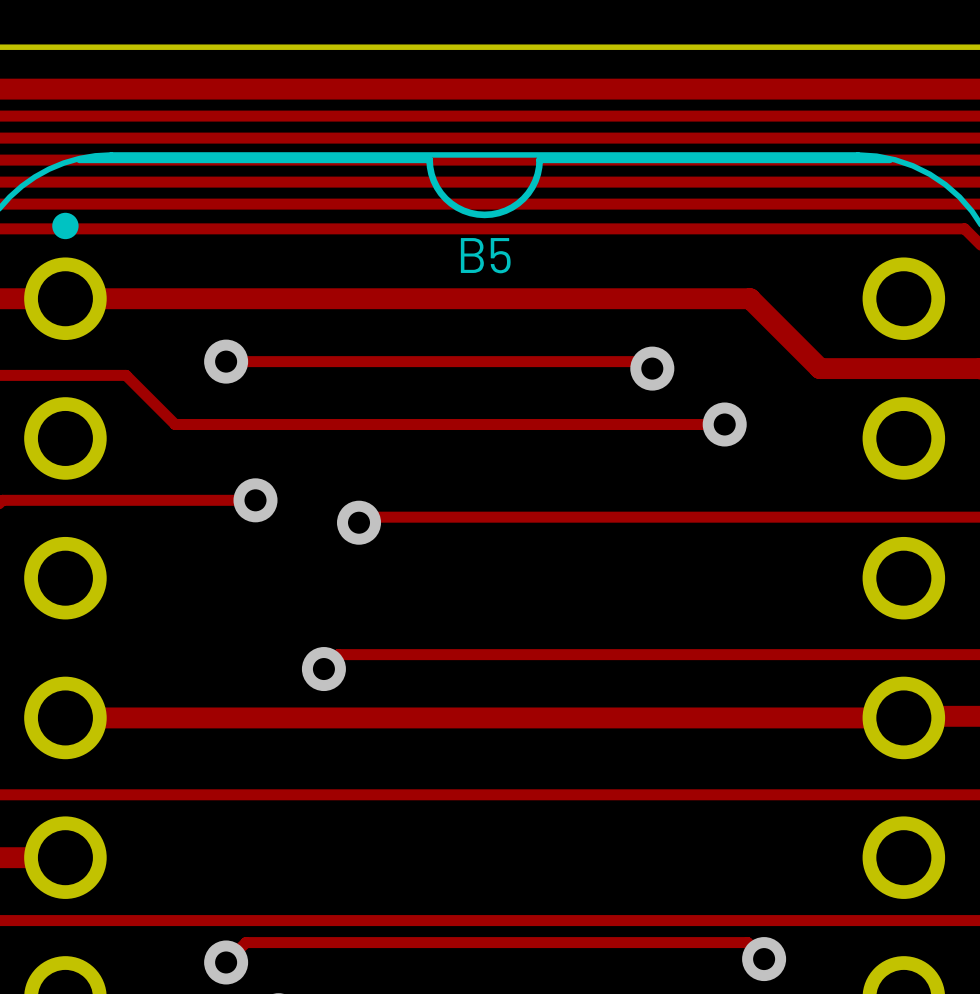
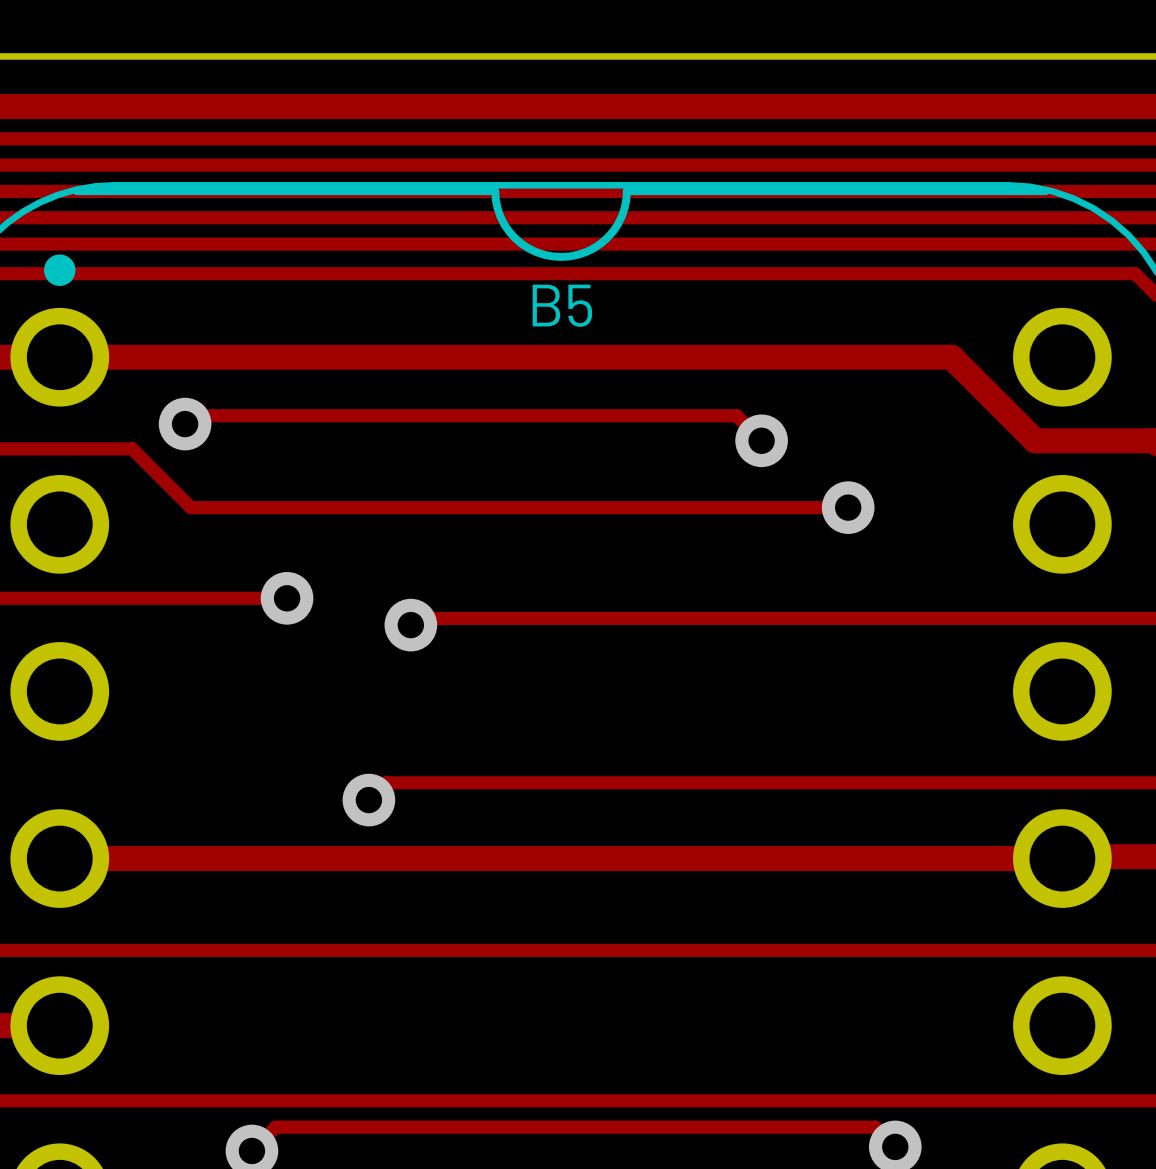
track: (750, 298) (820, 368) (881, 368) -> (878, 357) (951, 357) (1035, 440)
track: (226, 361) (645, 361) -> (185, 424) (193, 415) (736, 415) (753, 432)
via position: (226, 361) -> (185, 424)

